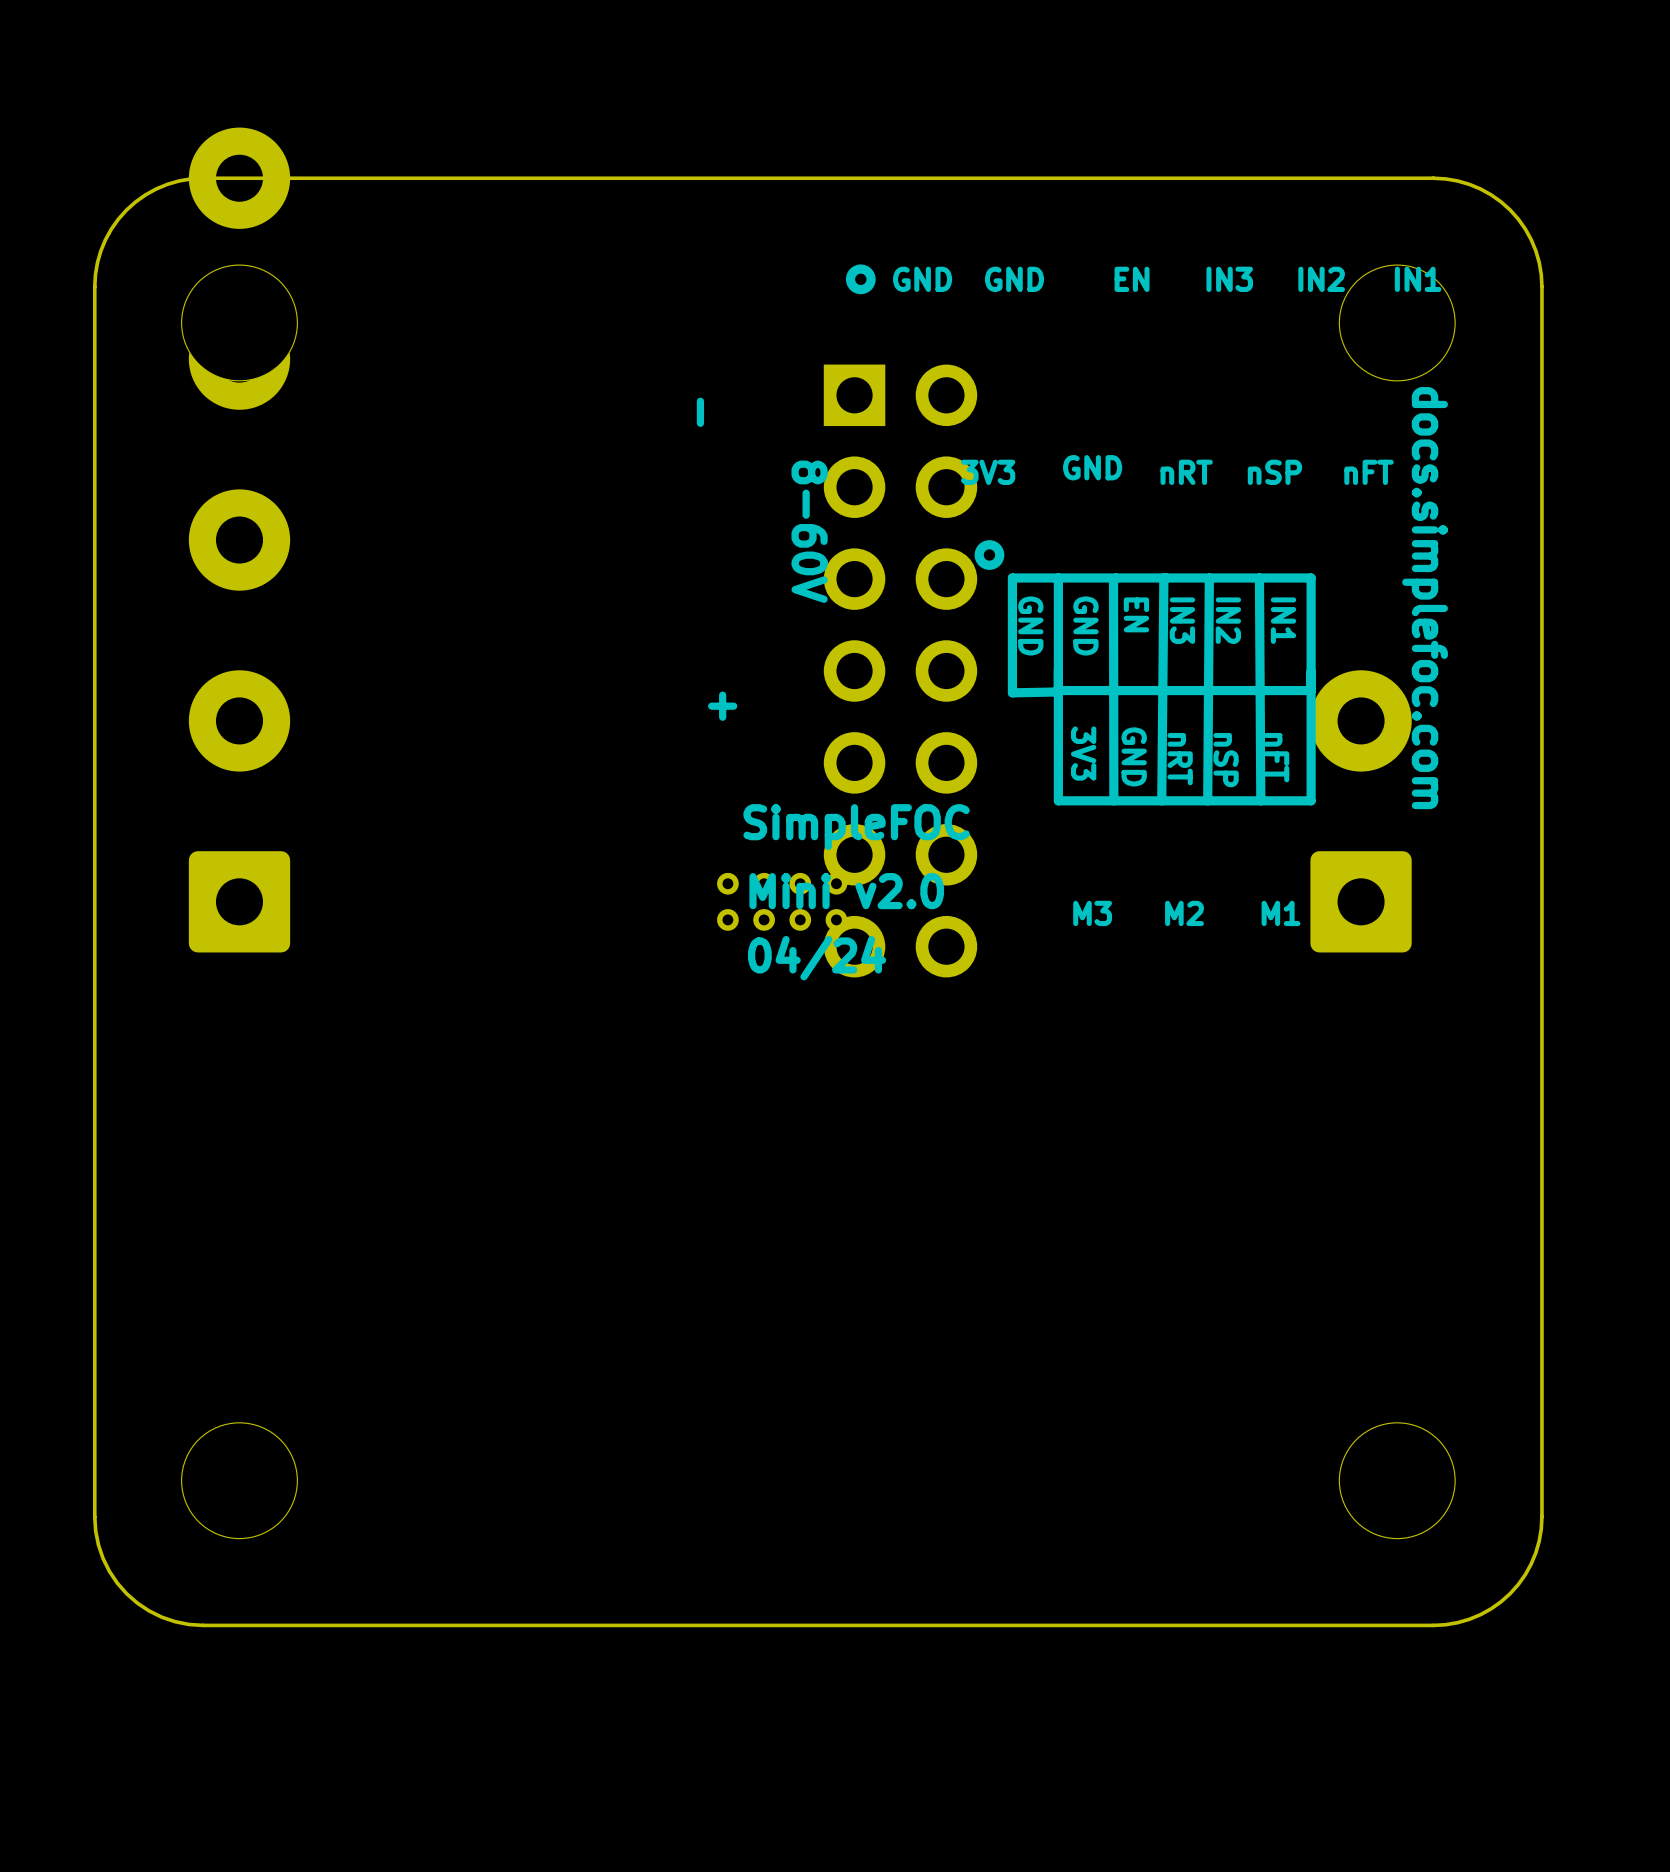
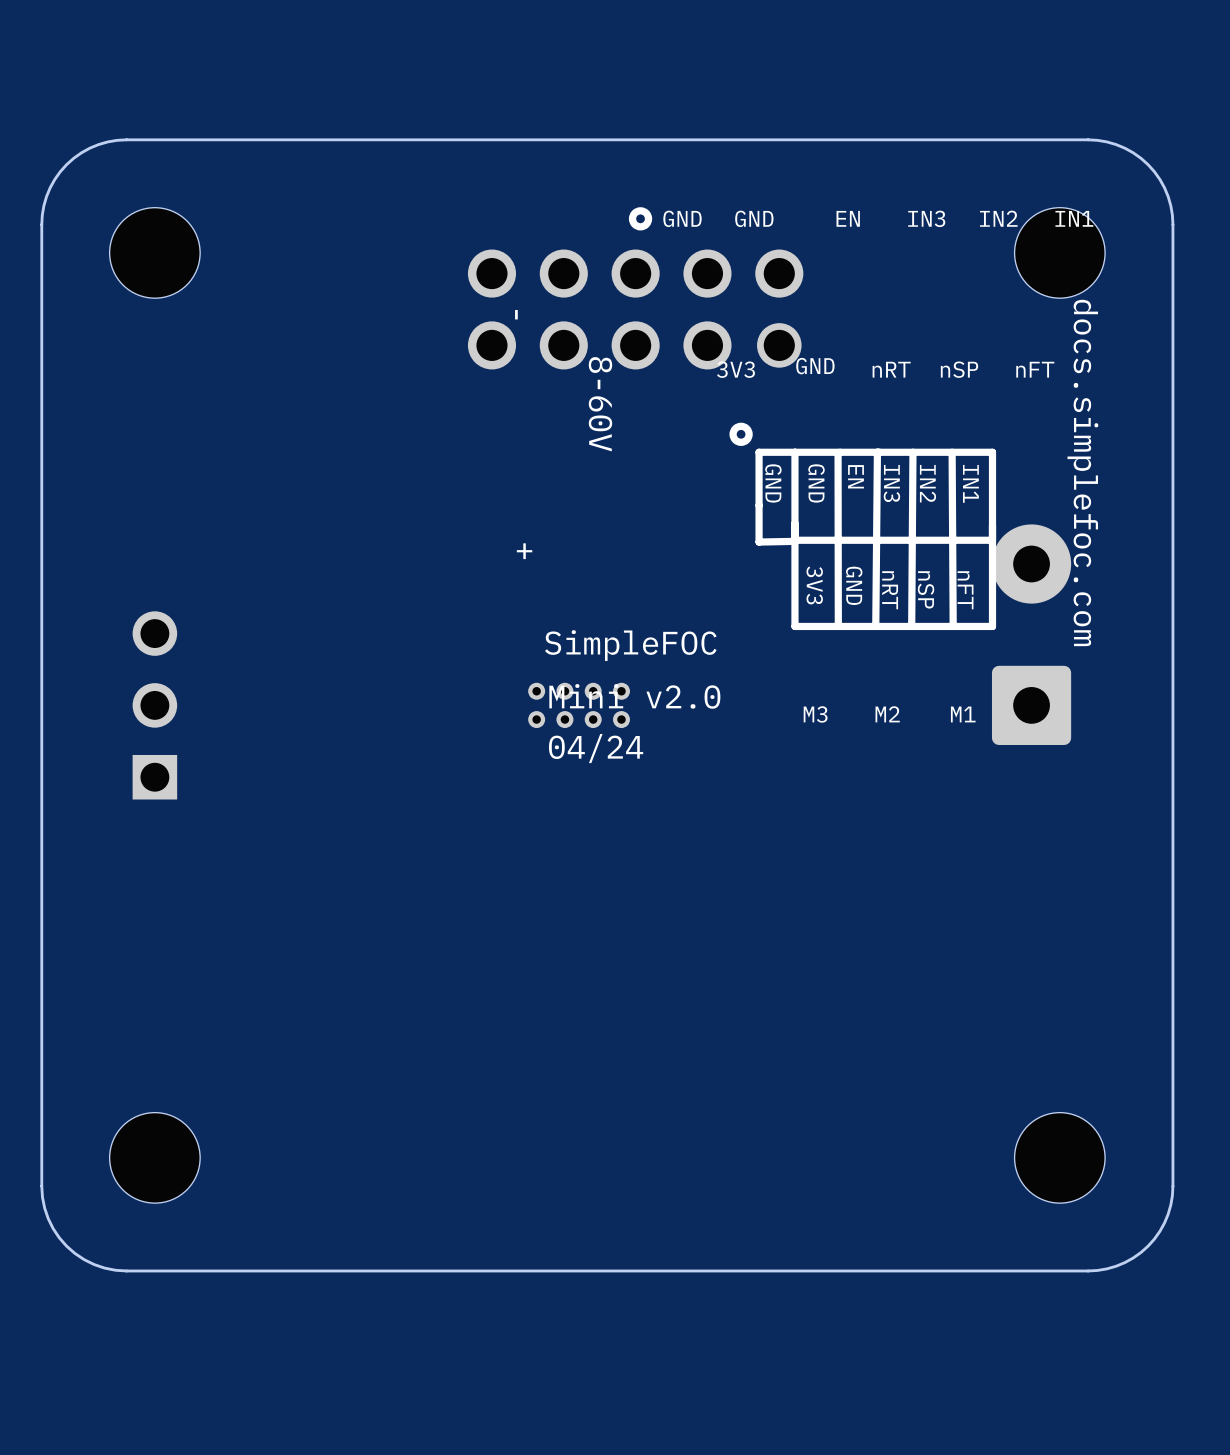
part: none -> (635, 309)
part: (239, 540) -> none
part: (900, 671) -> none
part: none -> (154, 705)

